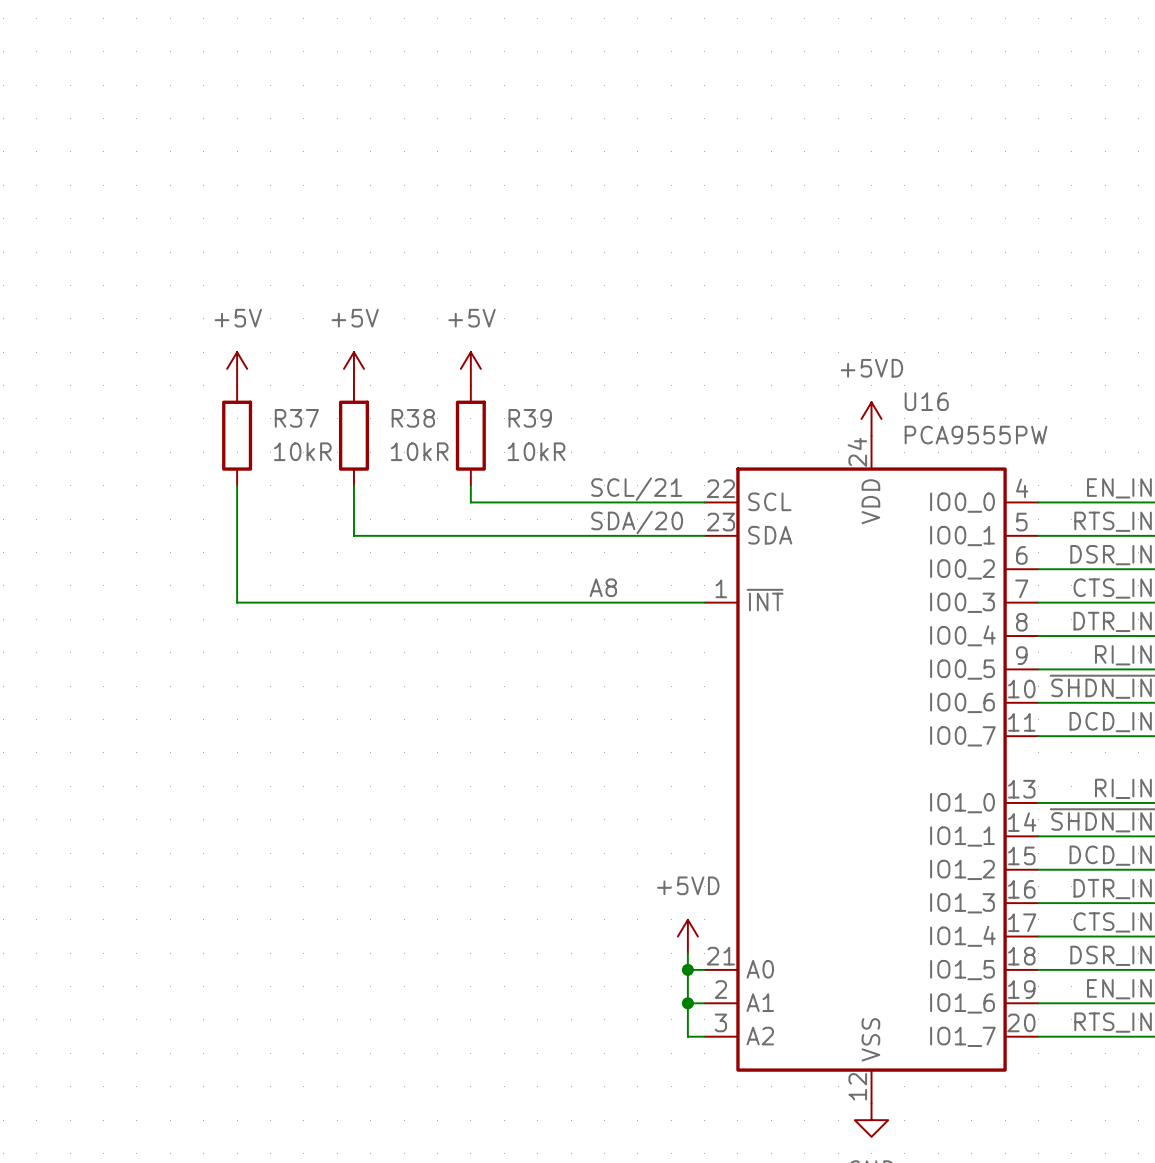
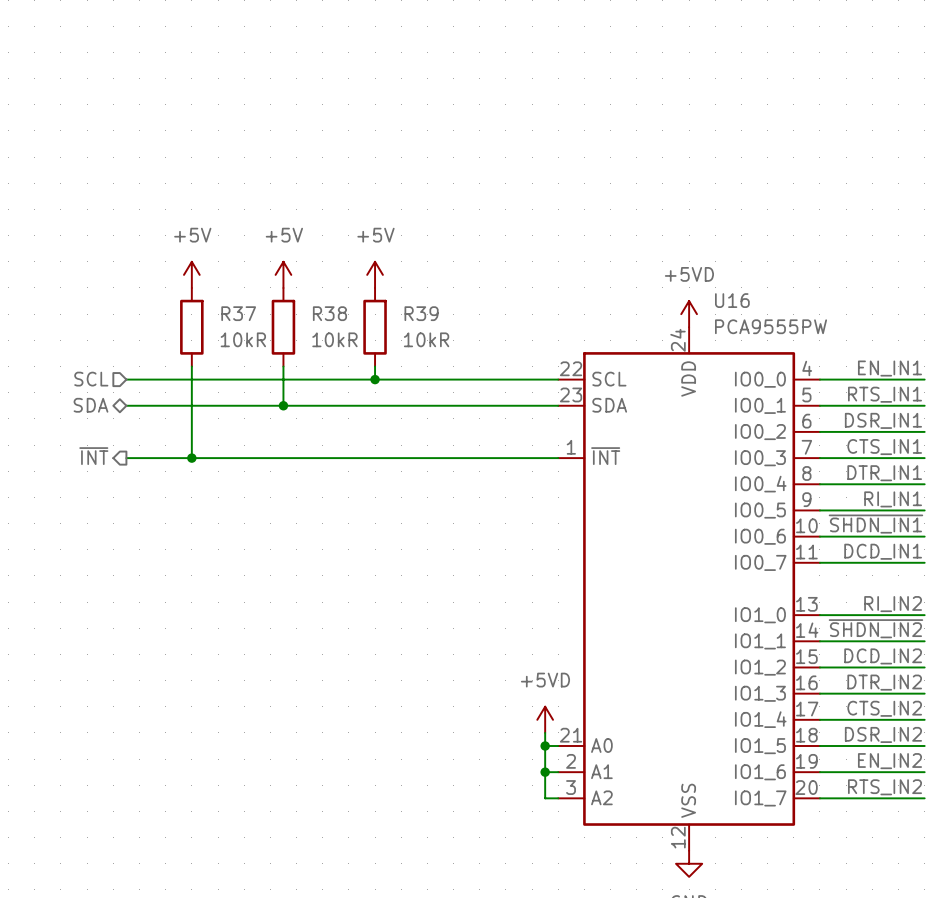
label: SCL/21 (636, 489) -> none
hierarchical label: none -> SCL (91, 379)
wire: none -> (126, 379) (375, 379)
junction: none -> (375, 379)
label: SDA/20 (637, 522) -> none
hierarchical label: none -> SDA (91, 405)
wire: none -> (126, 405) (283, 405)
junction: none -> (283, 405)
label: A8 (603, 587) -> none
hierarchical label: none -> ~{INT} (93, 456)
wire: none -> (126, 458) (191, 458)
junction: none -> (191, 458)

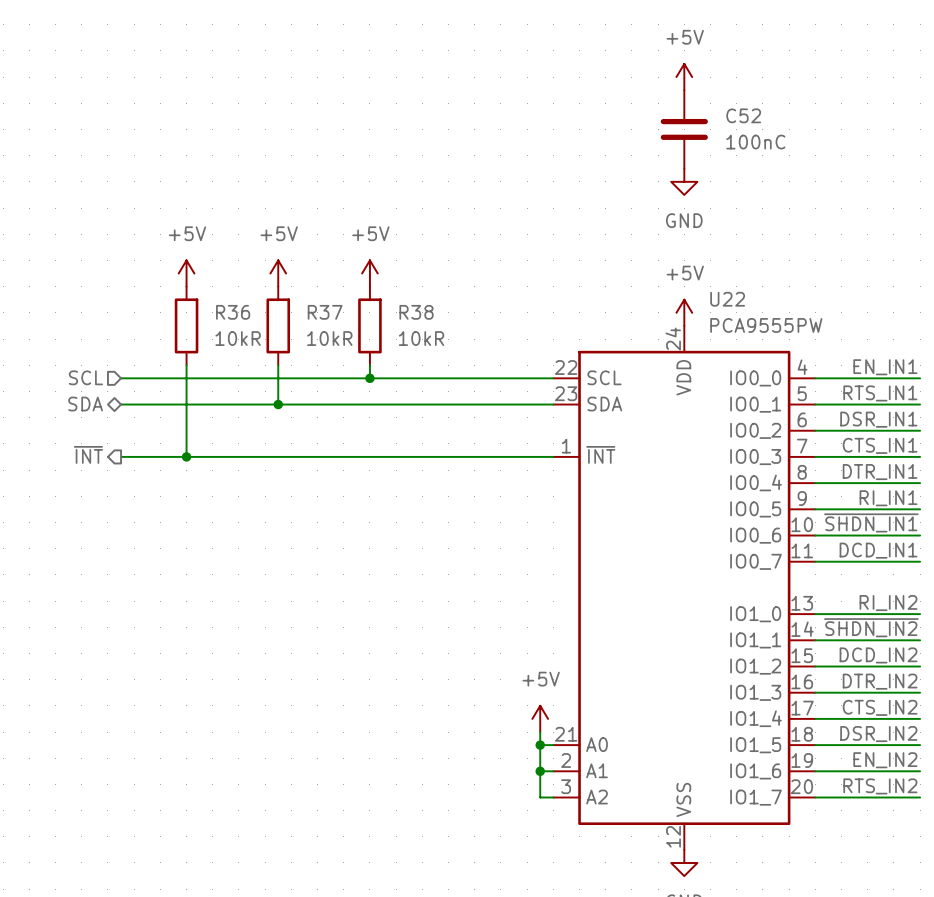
power symbol: none -> +5V (684, 77)
C52: none -> 100nC (684, 129)
power symbol: none -> GND (684, 181)
U16 name: U16 (732, 300) -> U22 (727, 299)
R37 name: R37 (238, 313) -> R36 (233, 312)
R38 name: R38 (329, 313) -> R37 (325, 312)
R39 name: R39 (421, 313) -> R38 (416, 312)
power symbol: +5VD (689, 314) -> +5V (684, 312)
power symbol: +5VD (545, 719) -> +5V (540, 718)

